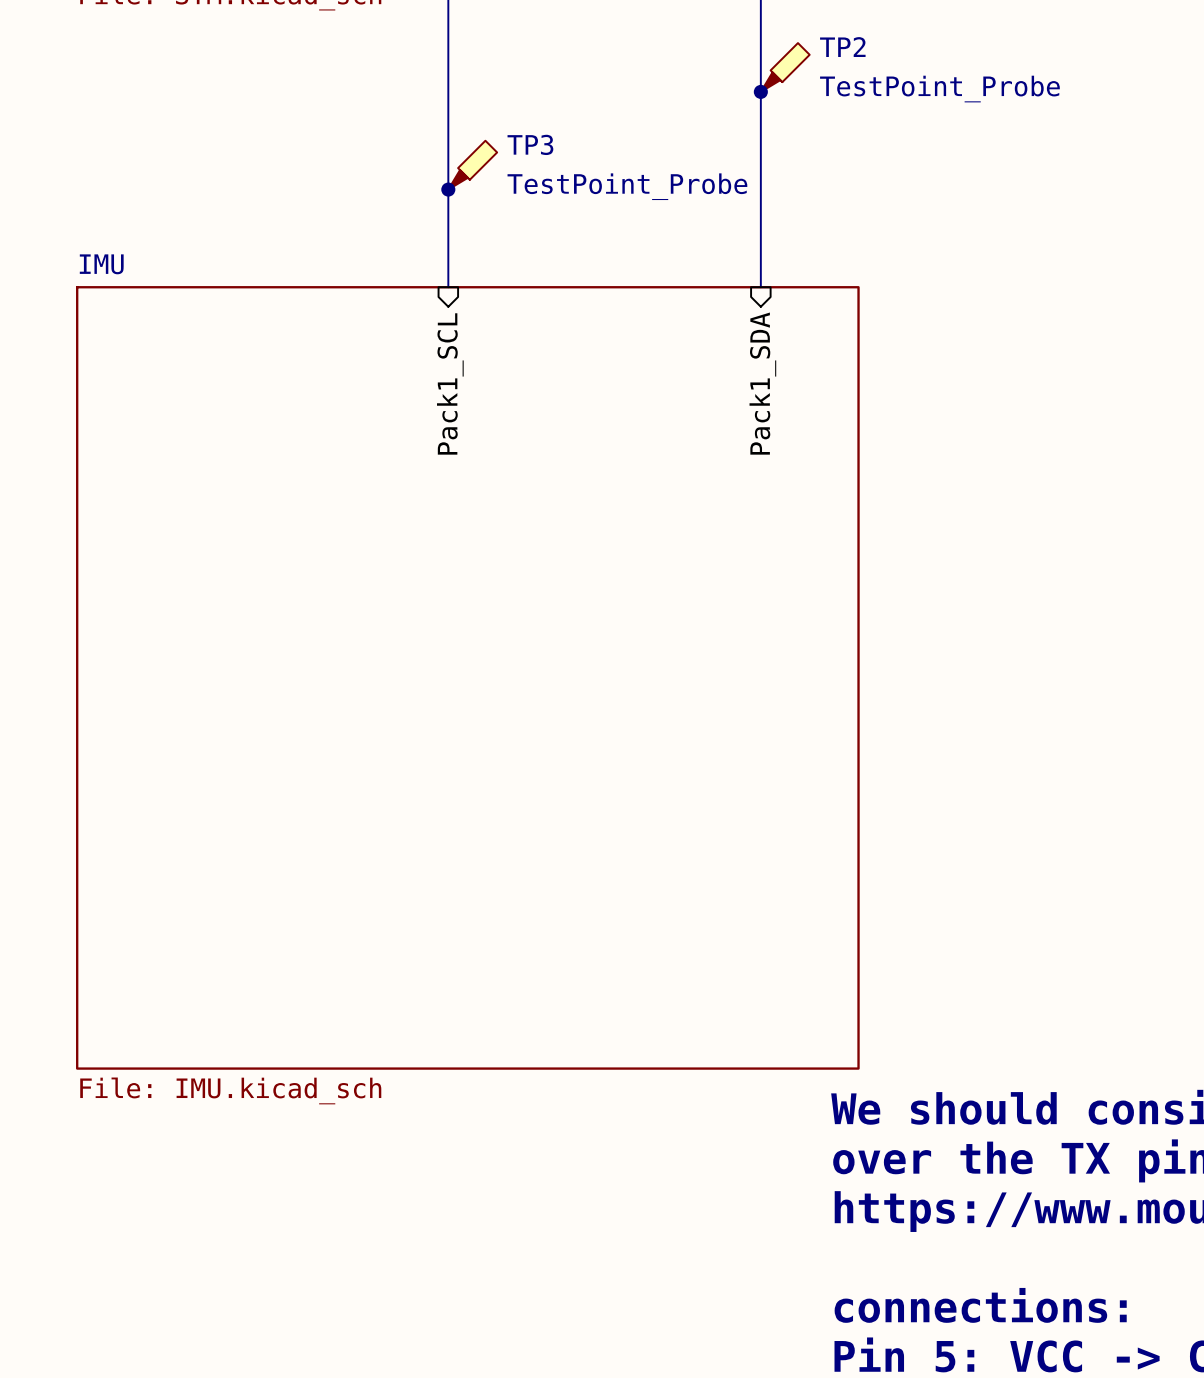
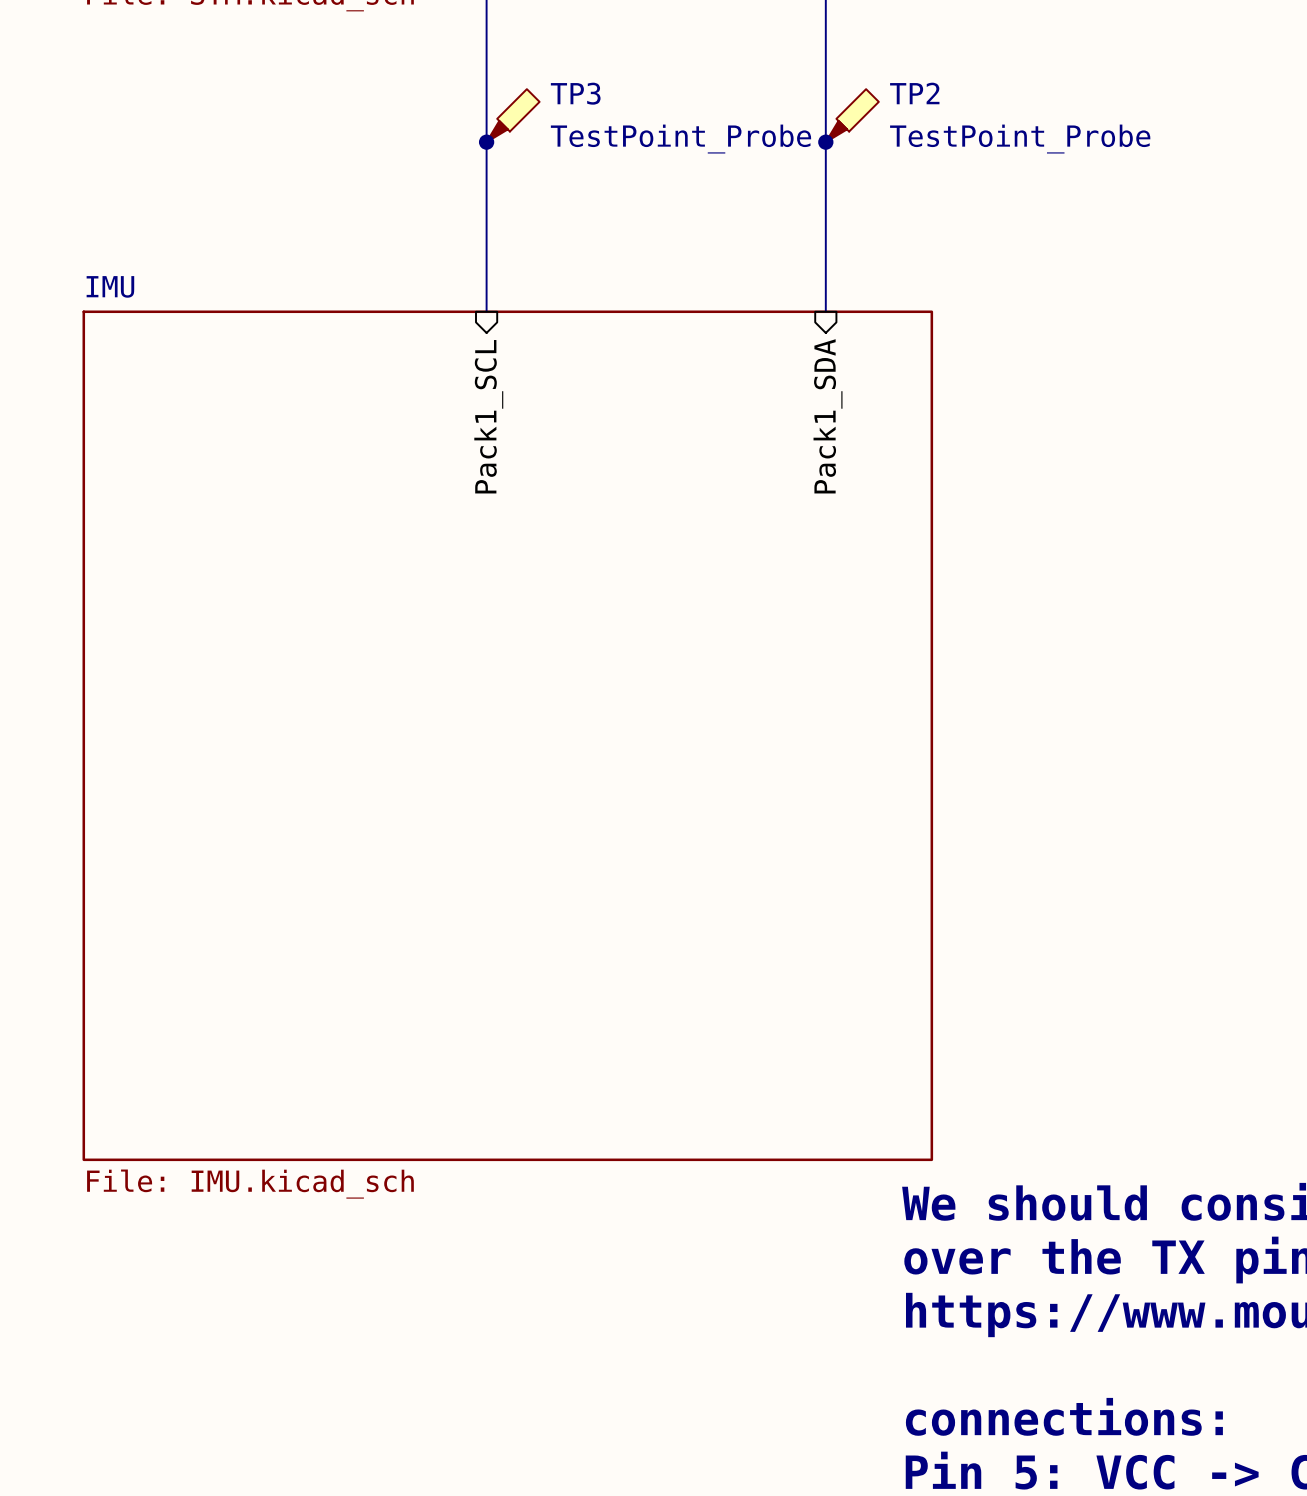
TP2 position: (785, 67) -> (852, 115)
junction position: (760, 91) -> (825, 142)
TP3 position: (472, 165) -> (513, 115)
junction position: (448, 189) -> (486, 142)

